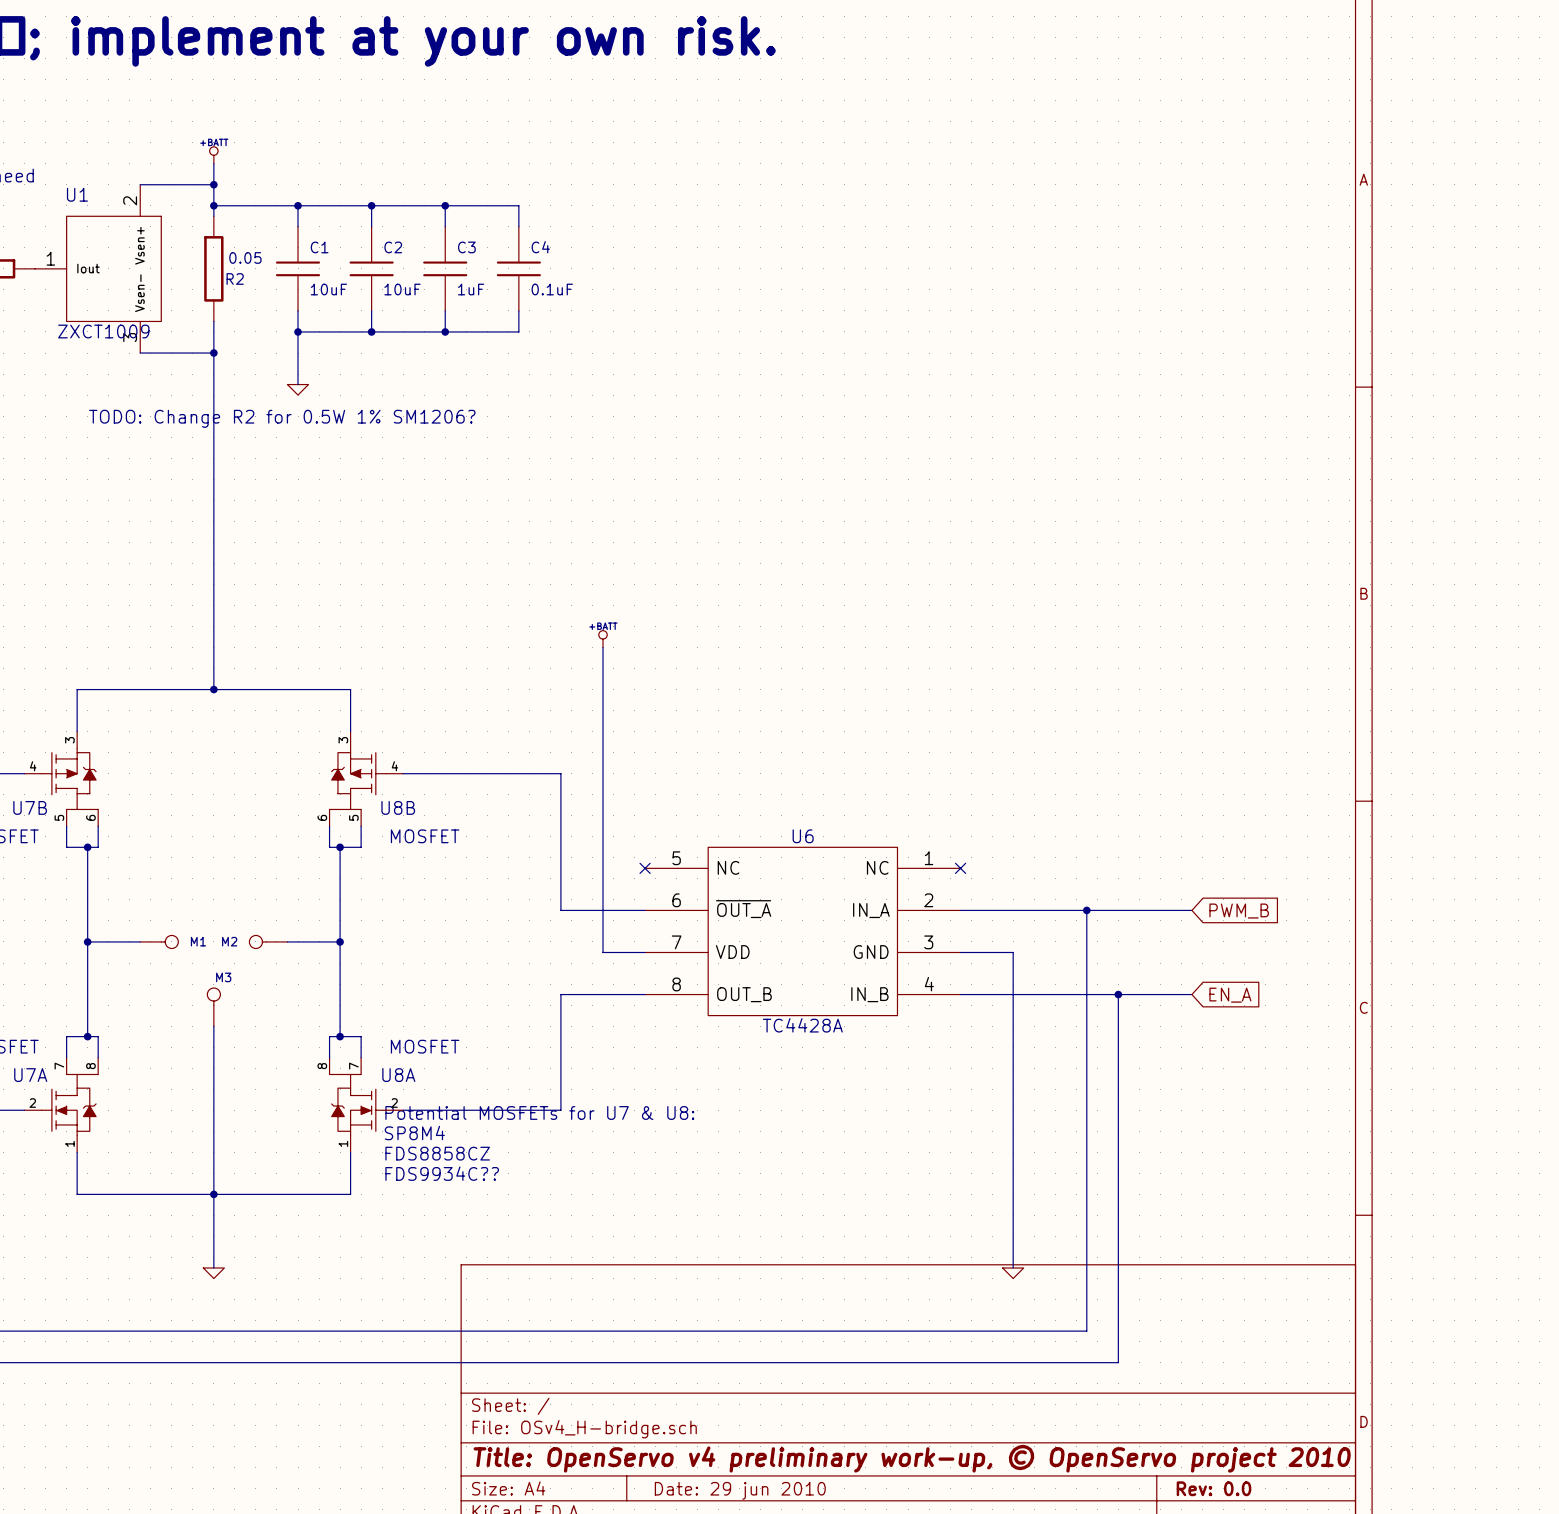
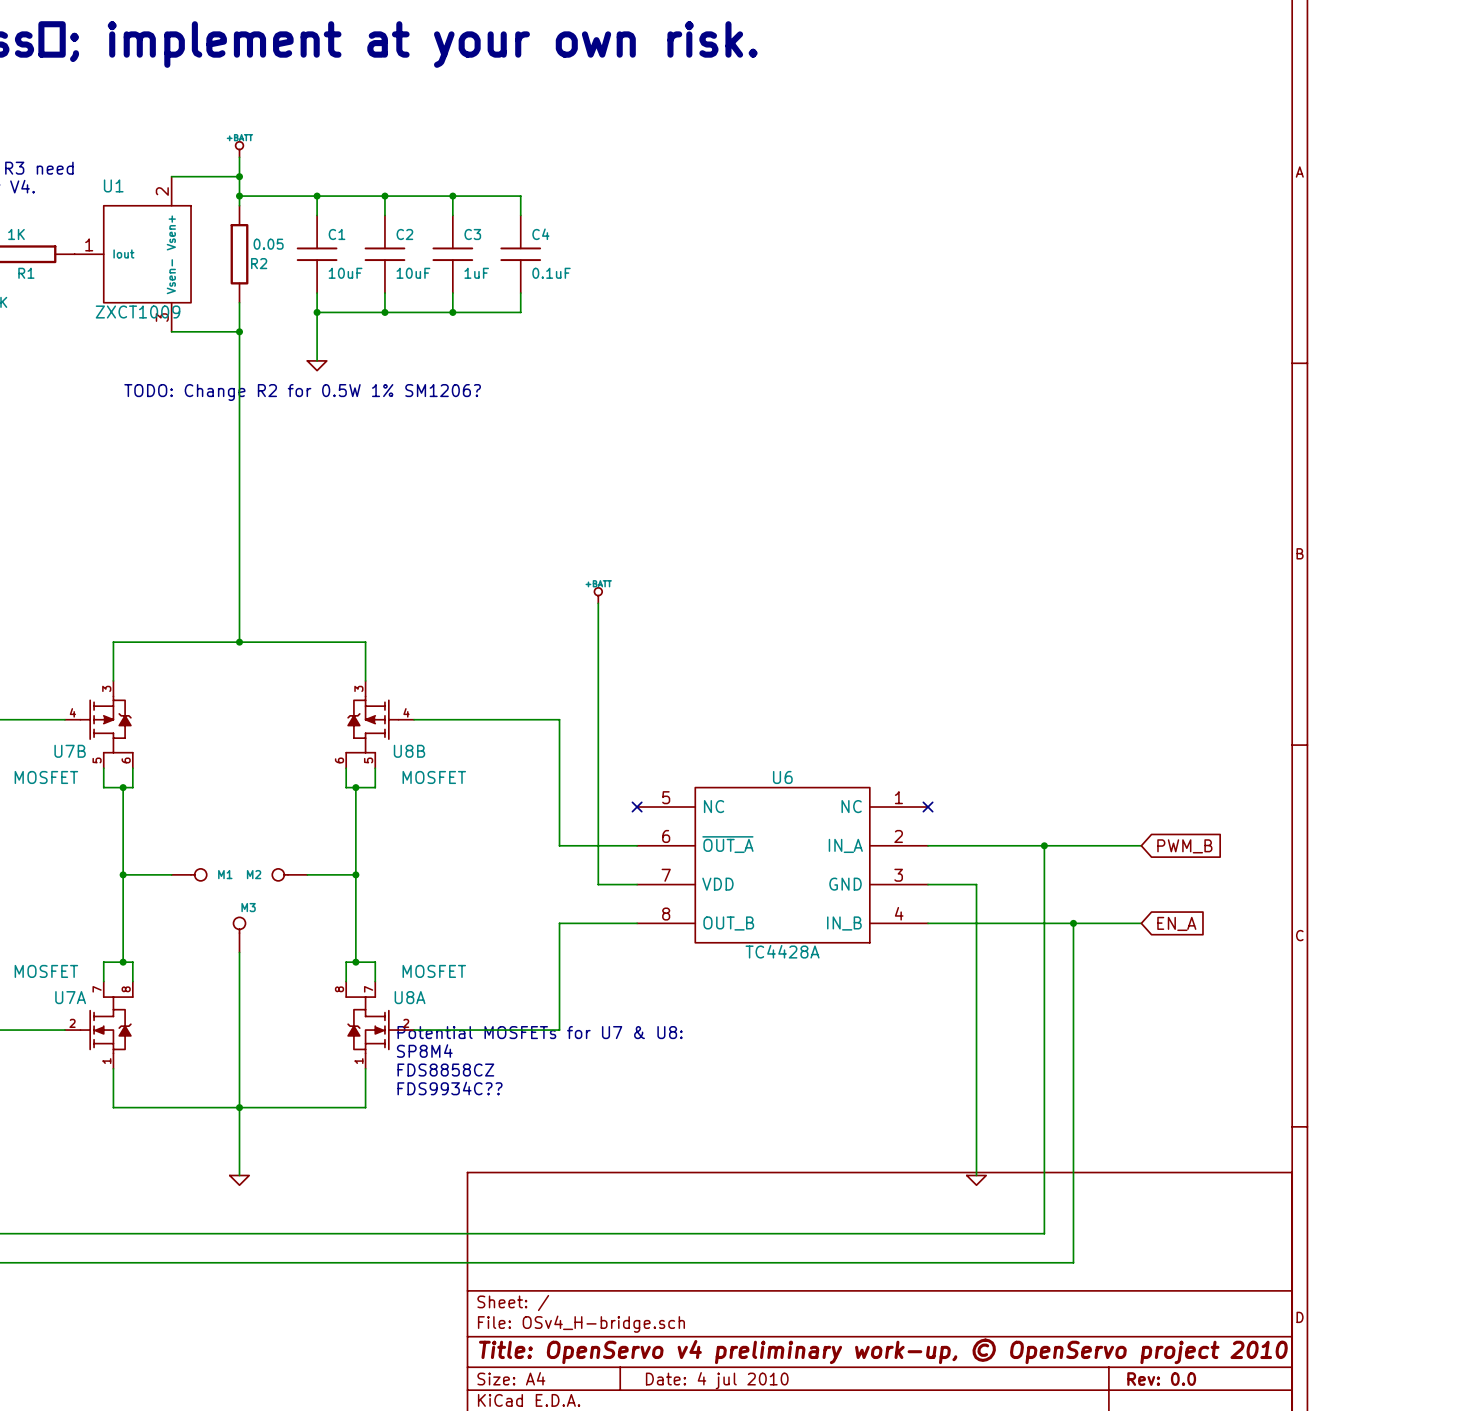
title block: Date: 29 jun 2010 (740, 1490) -> Date: 4 jul 2010 (717, 1380)

